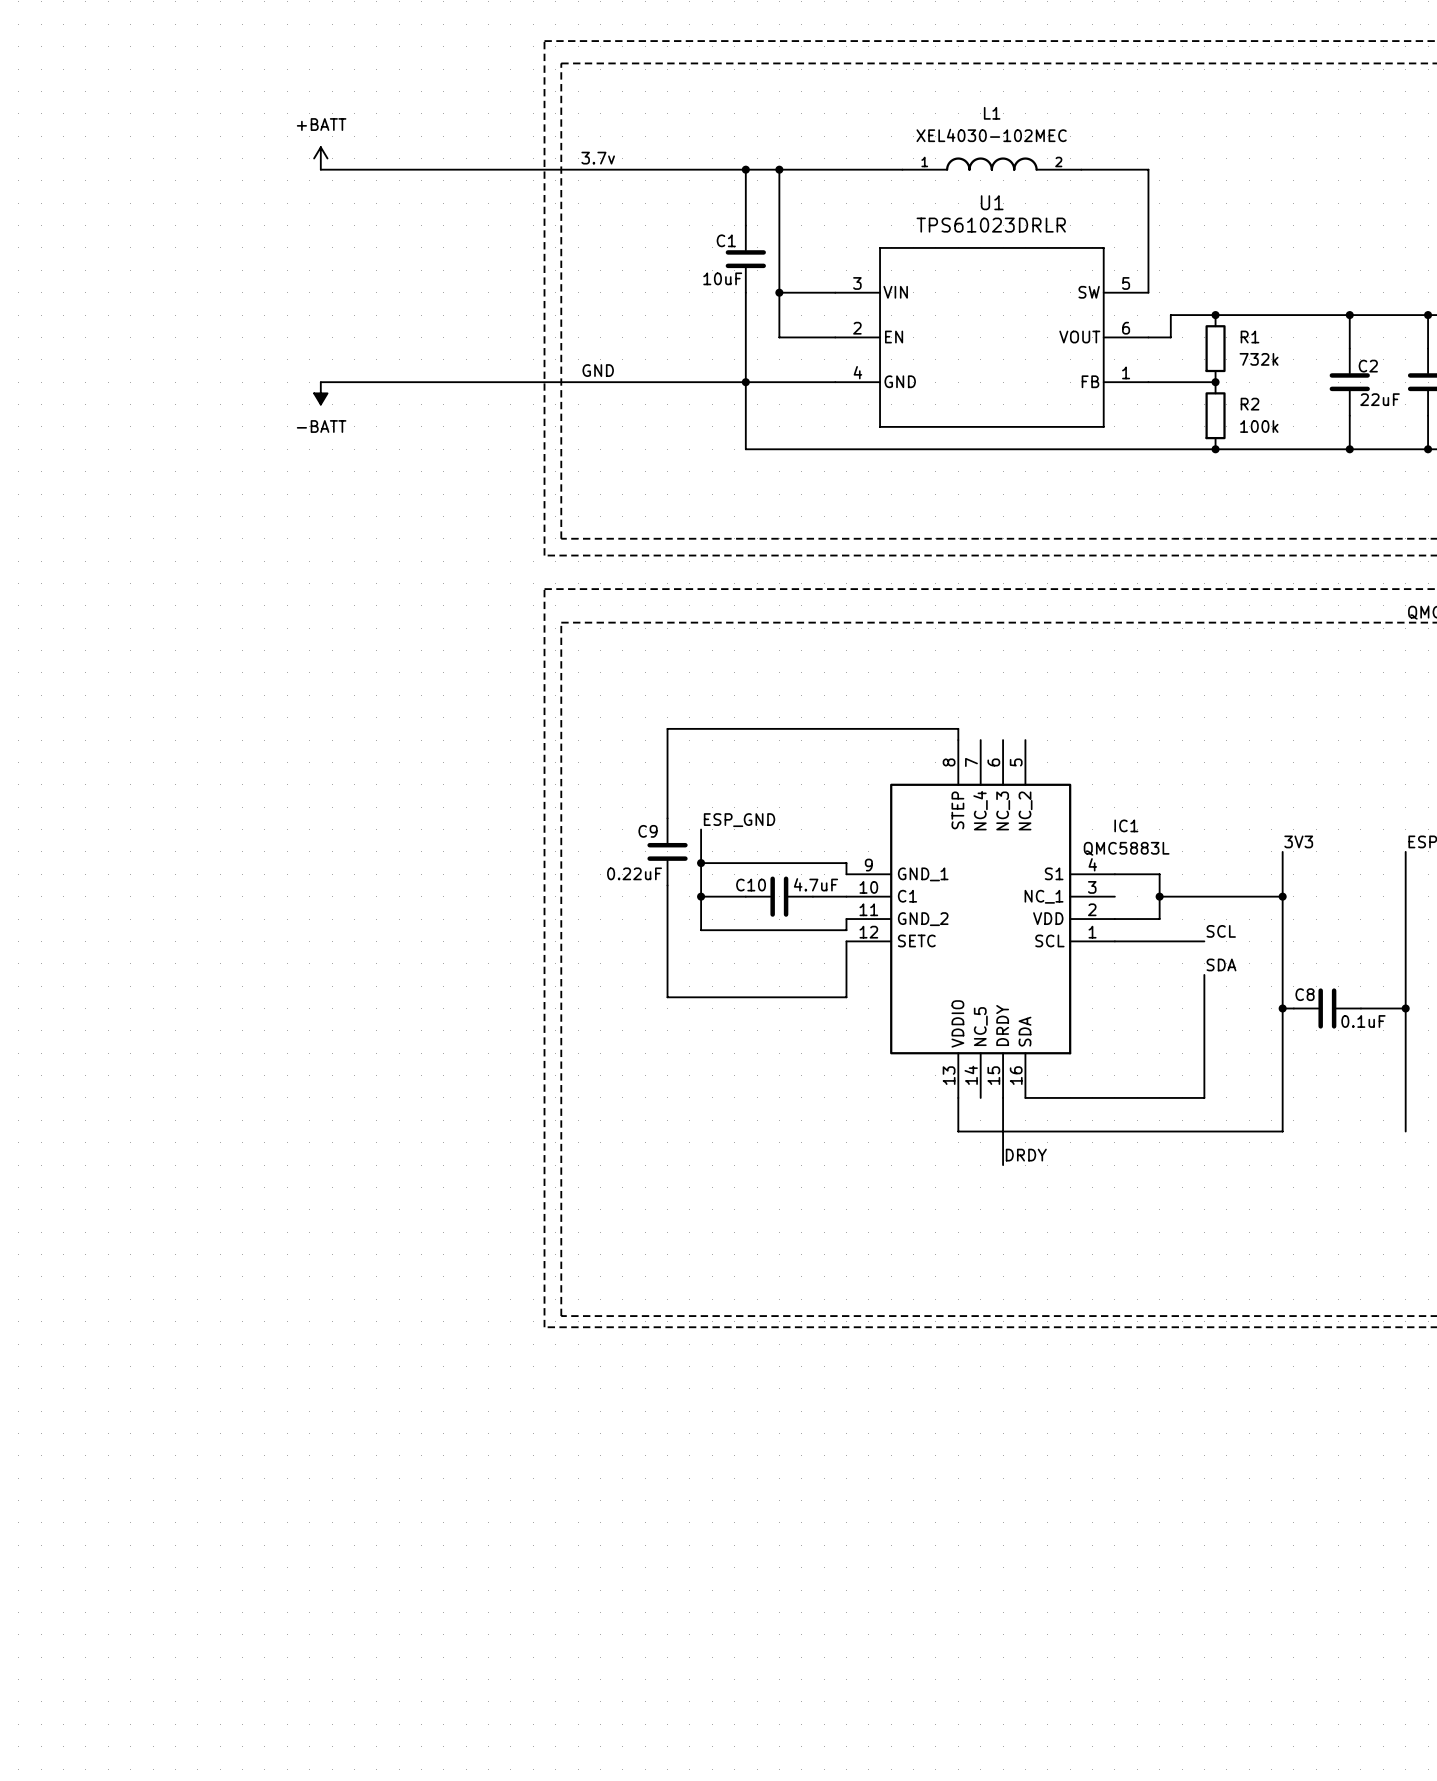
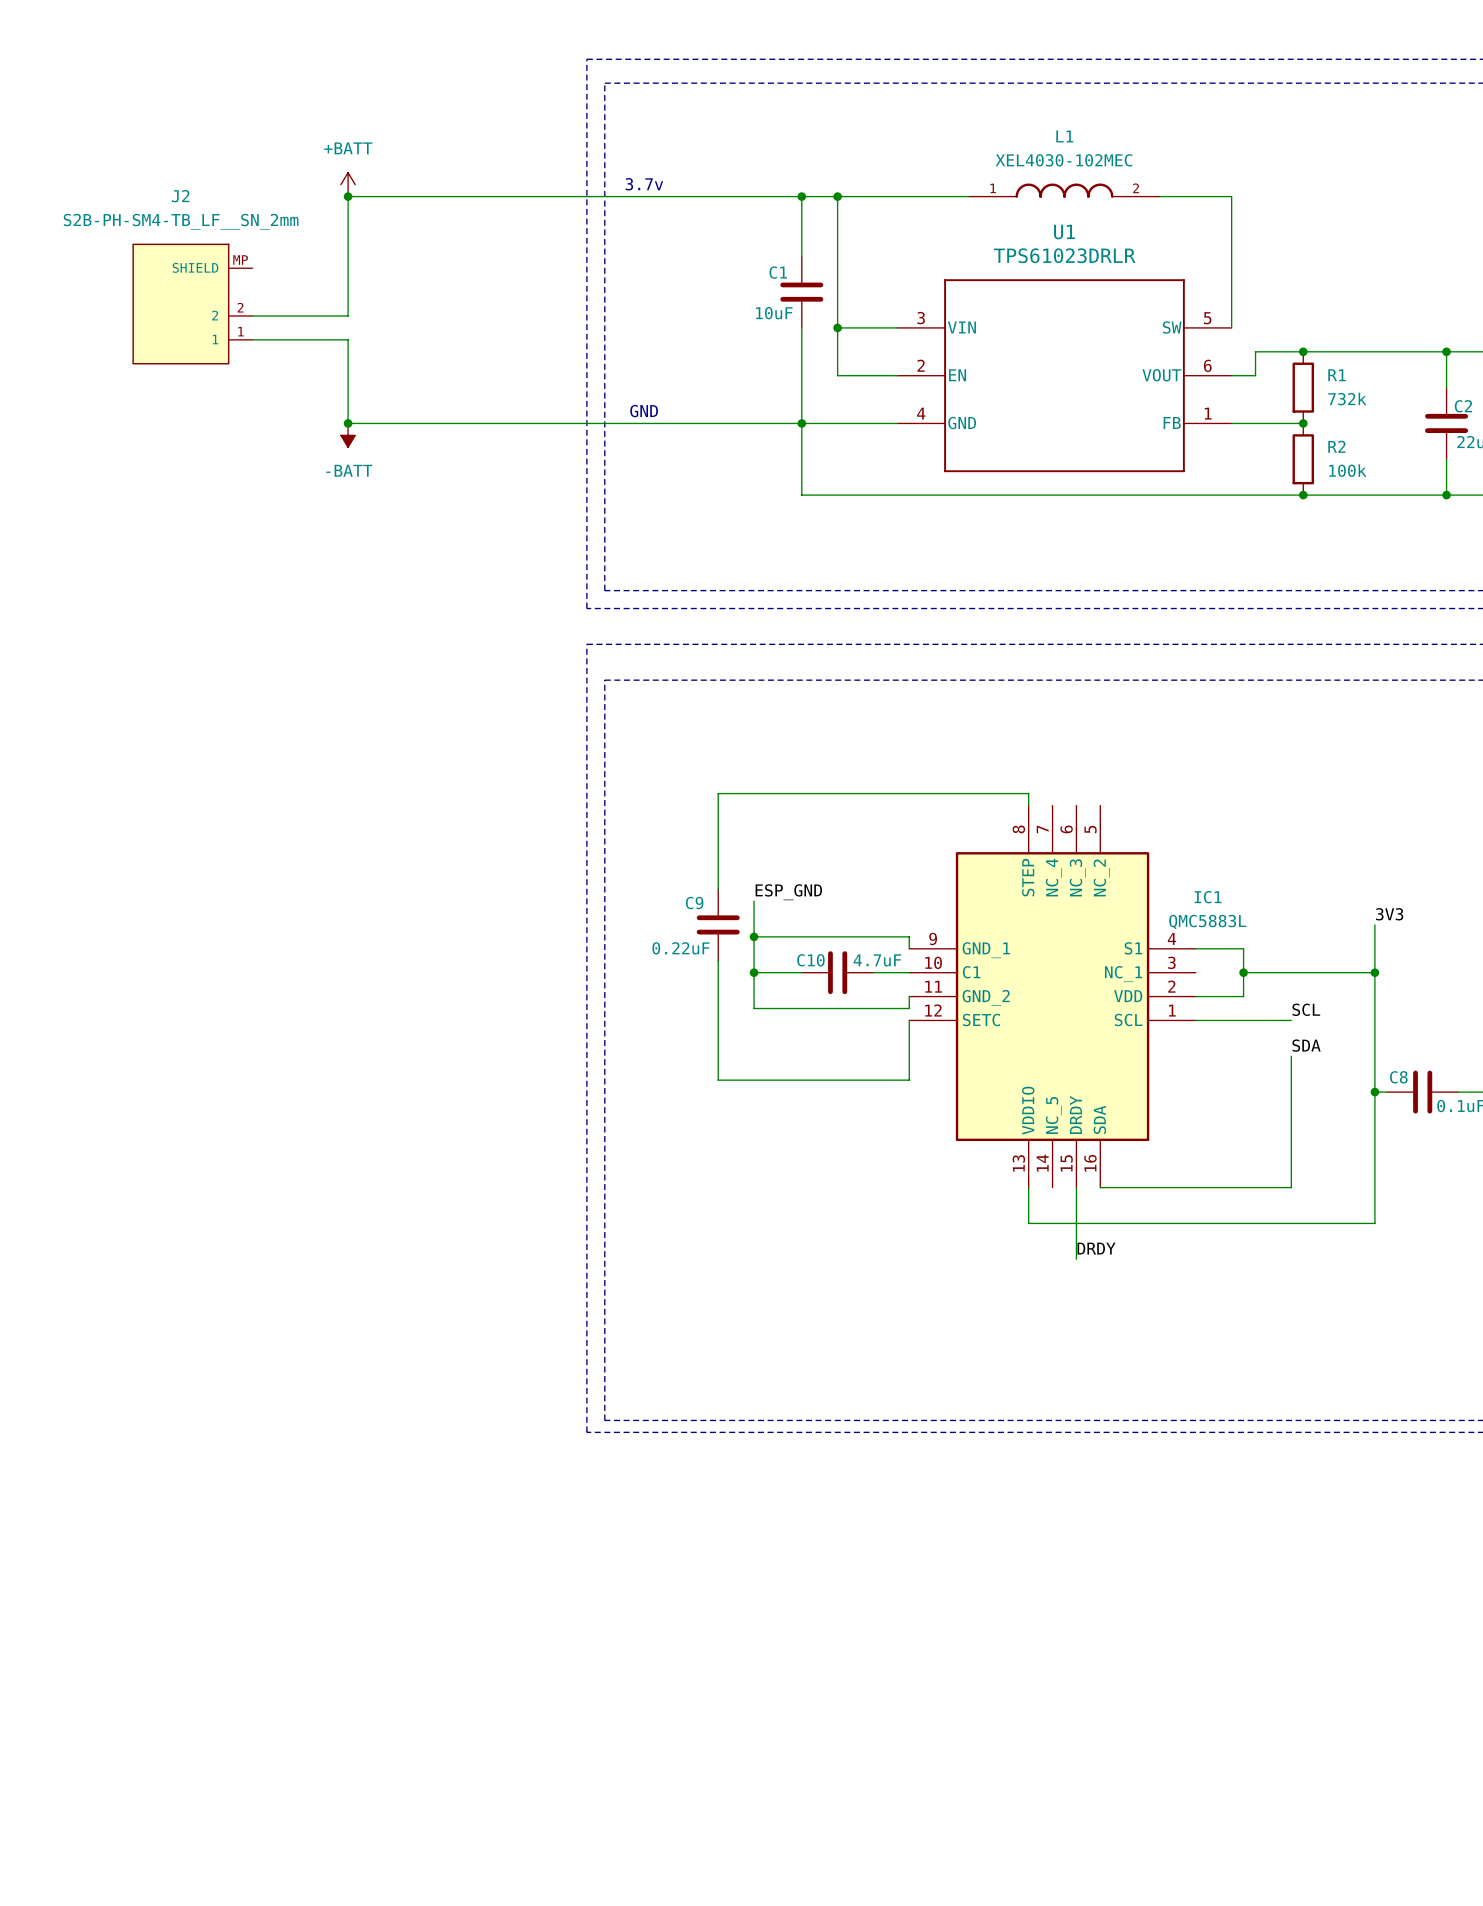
wire: none -> (348, 196) (348, 315) (252, 315)
junction: none -> (348, 196)
J2: none -> S2B-PH-SM4-TB_LF__SN_2mm (192, 304)
wire: none -> (252, 339) (348, 339) (348, 423)
junction: none -> (348, 423)

